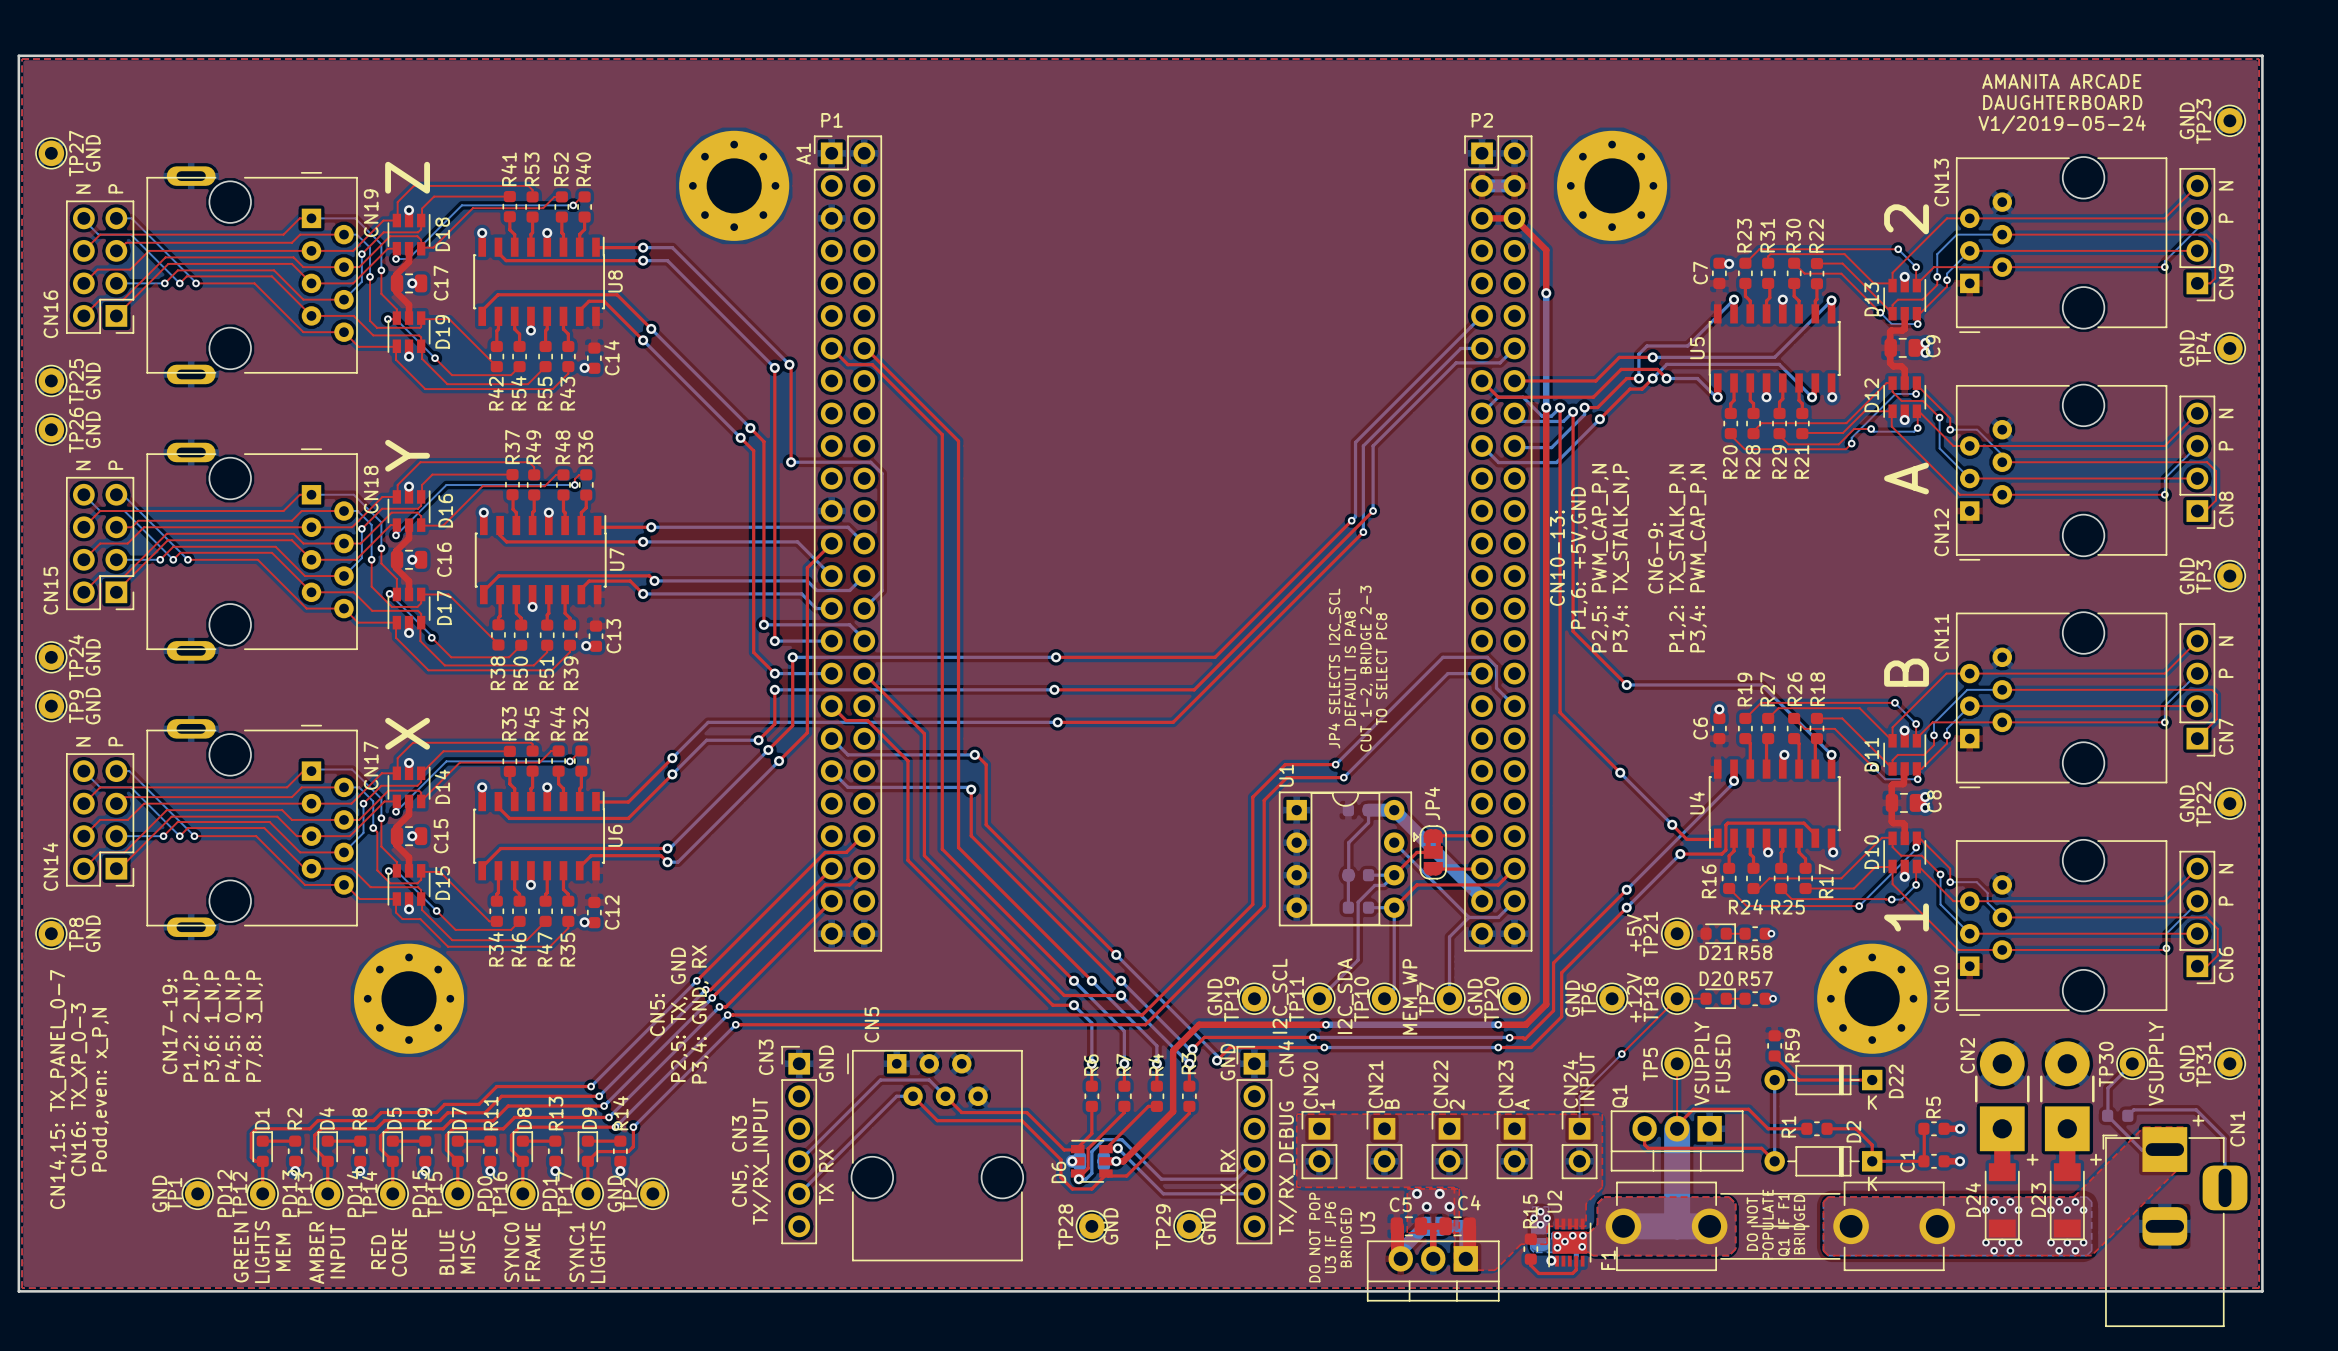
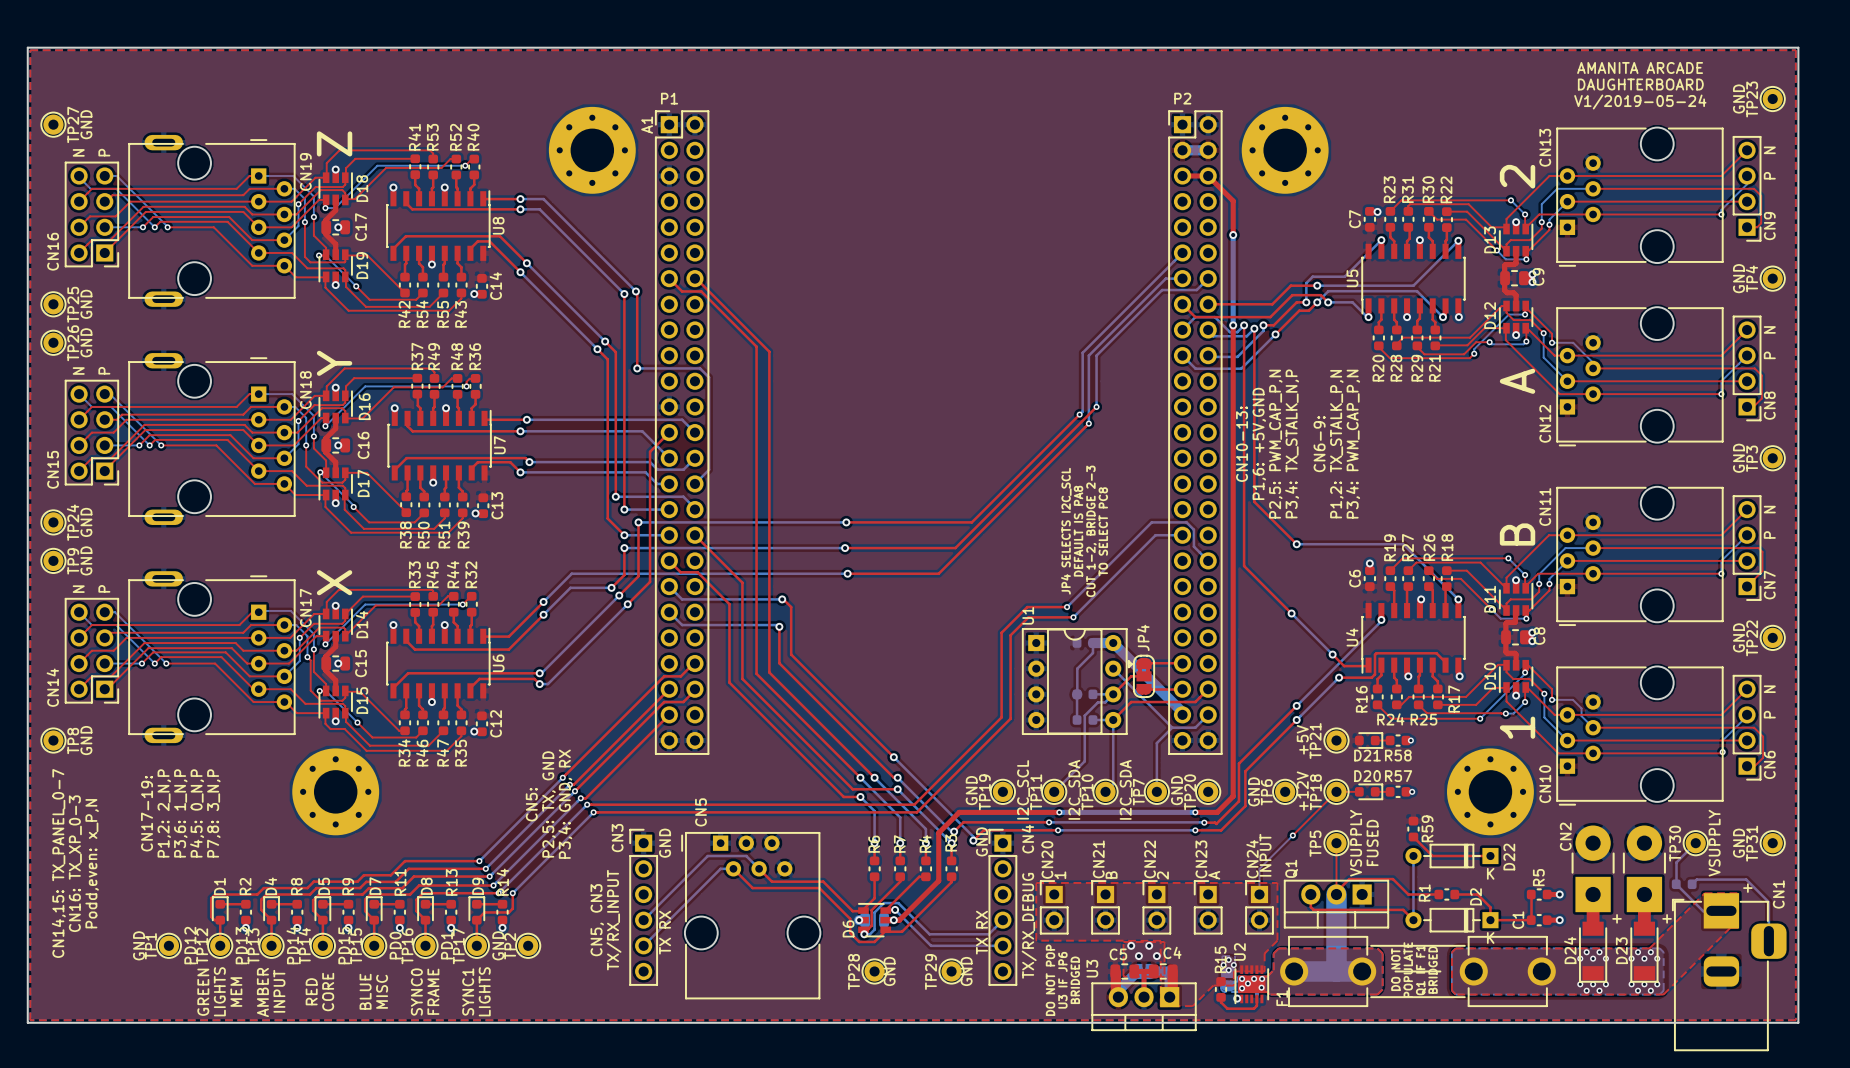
text: MEM_WP (1410, 996) -> I2C_SDA (1126, 789)

